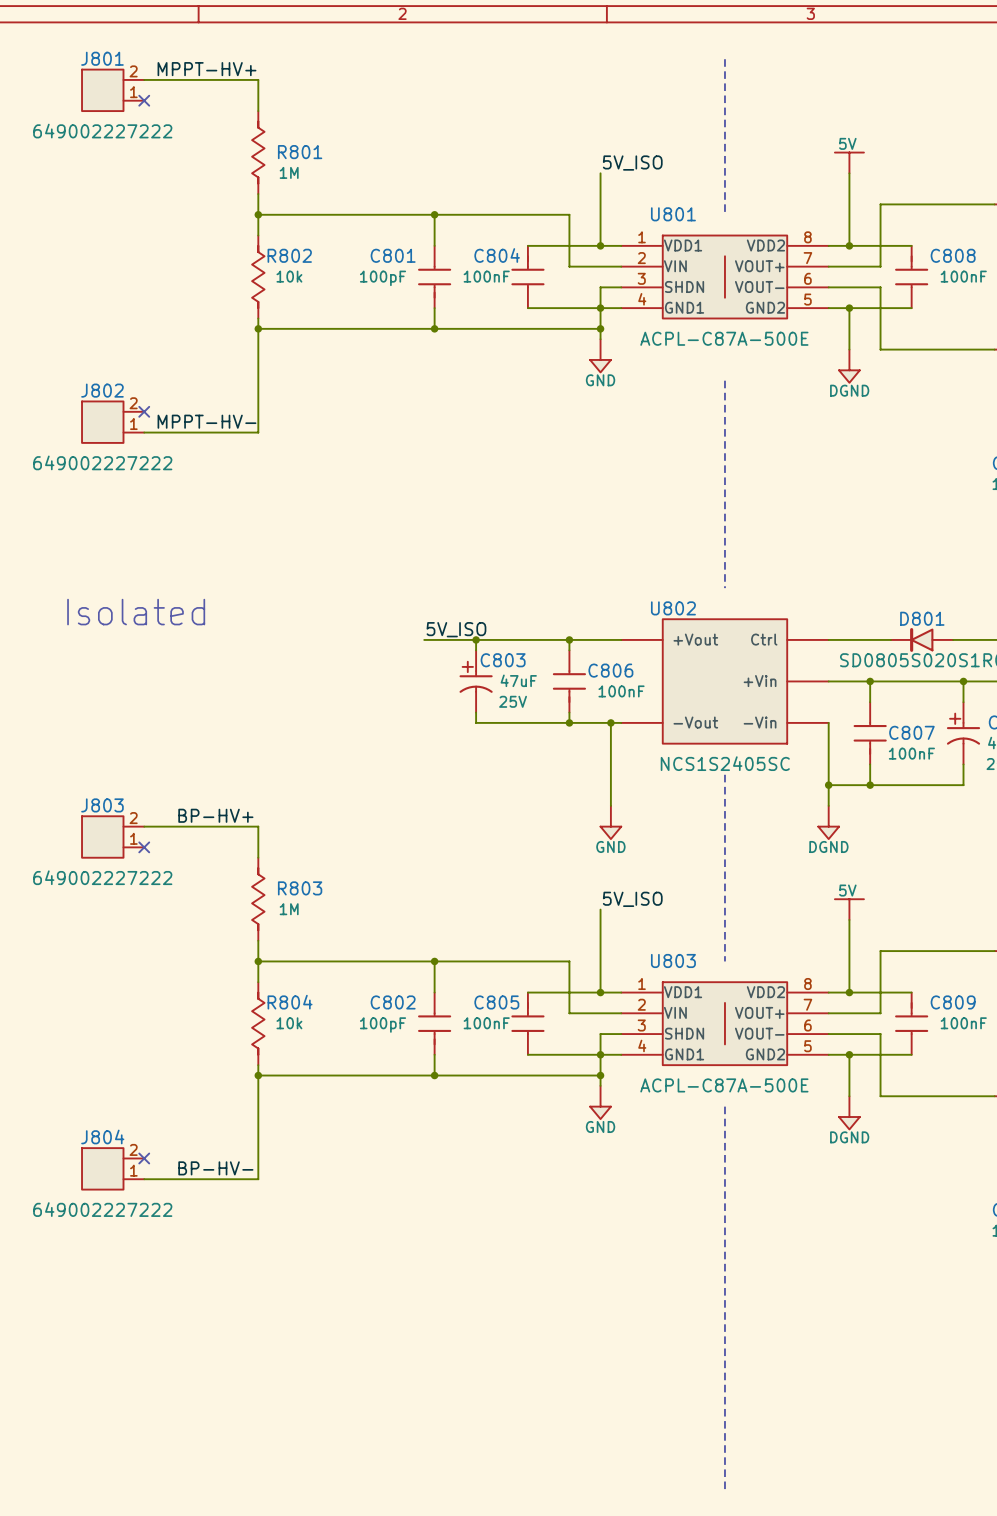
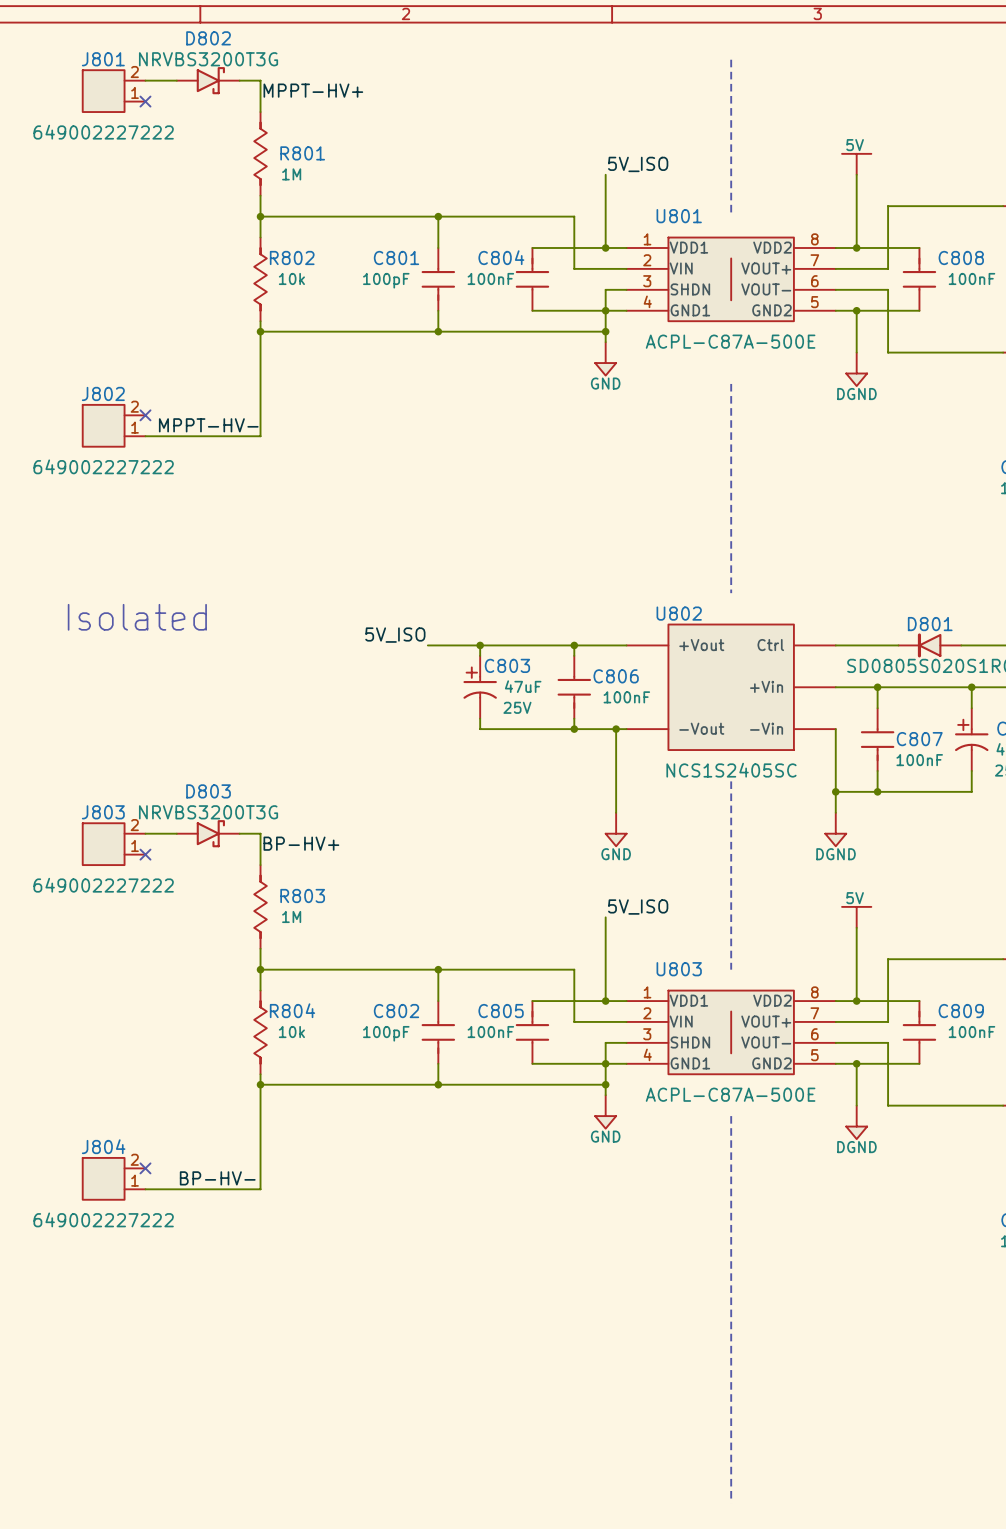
label position: MPPT-HV+ (206, 69) -> MPPT-HV+ (313, 90)
D802: none -> NRVBS3200T3G (208, 80)
label position: 5V_ISO (456, 629) -> 5V_ISO (395, 635)
label position: BP-HV+ (215, 815) -> BP-HV+ (301, 843)
D803: none -> NRVBS3200T3G (208, 833)

